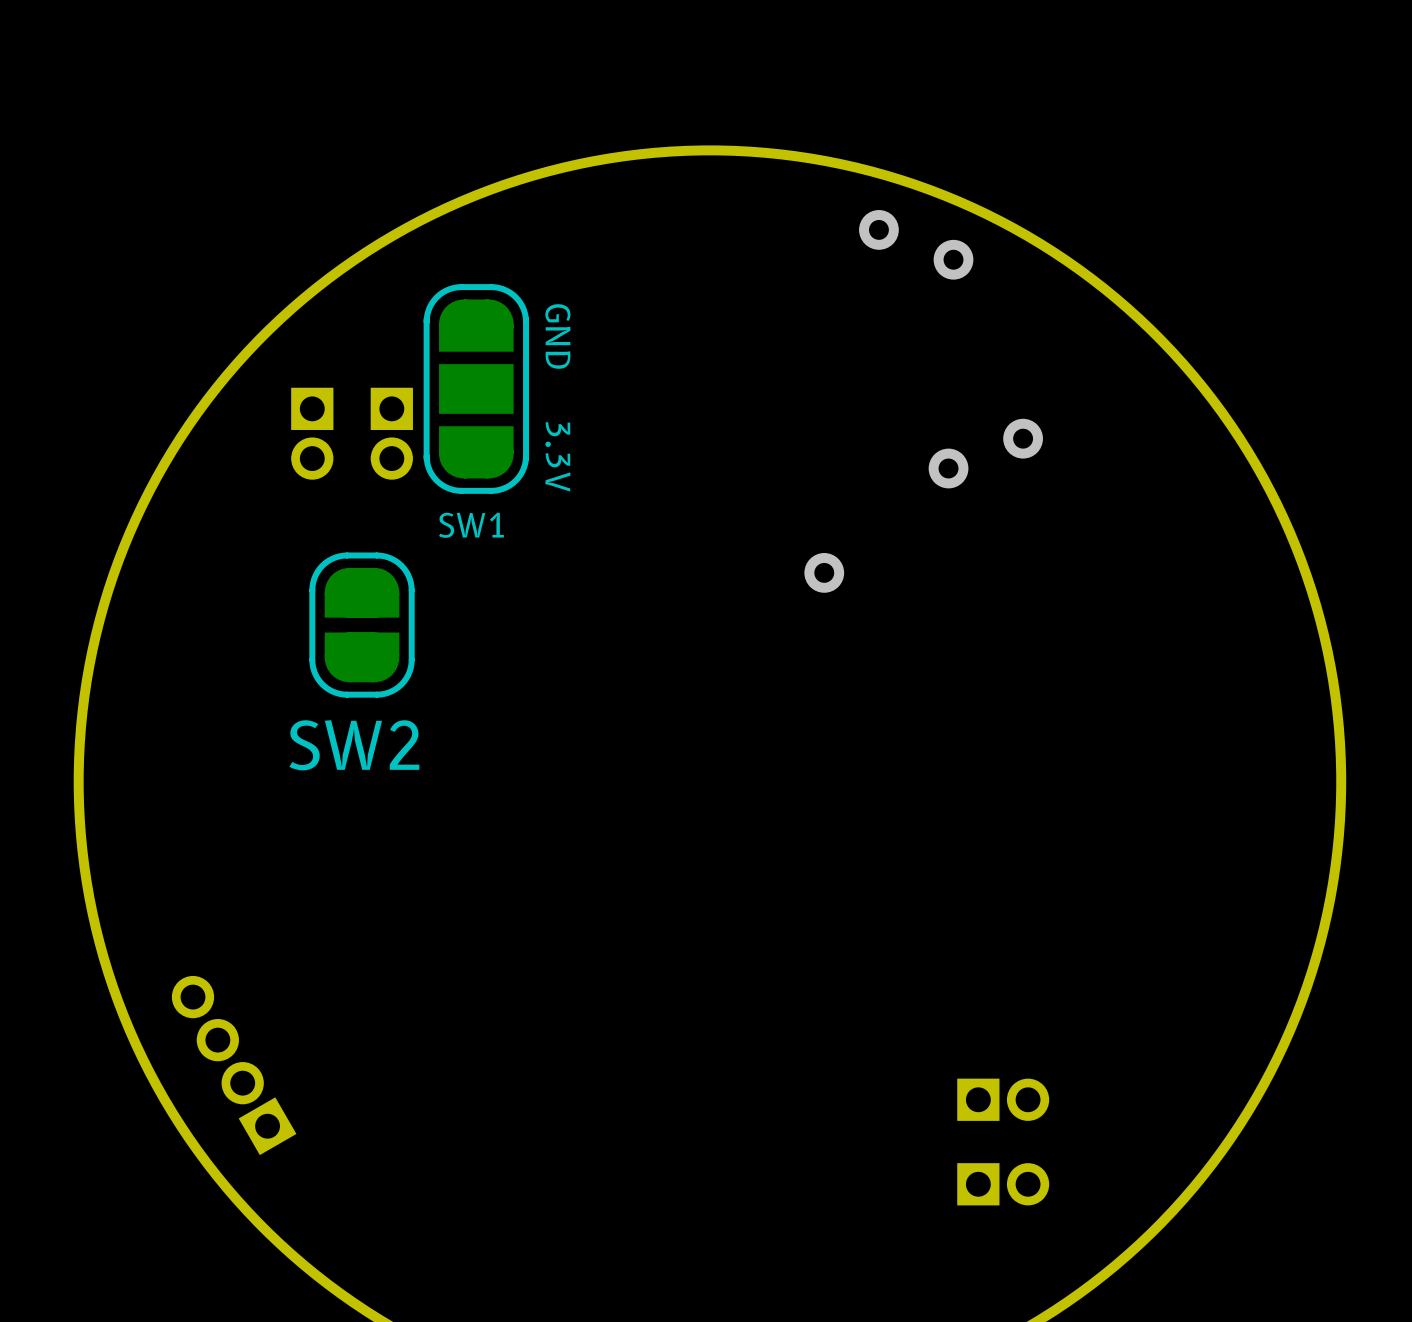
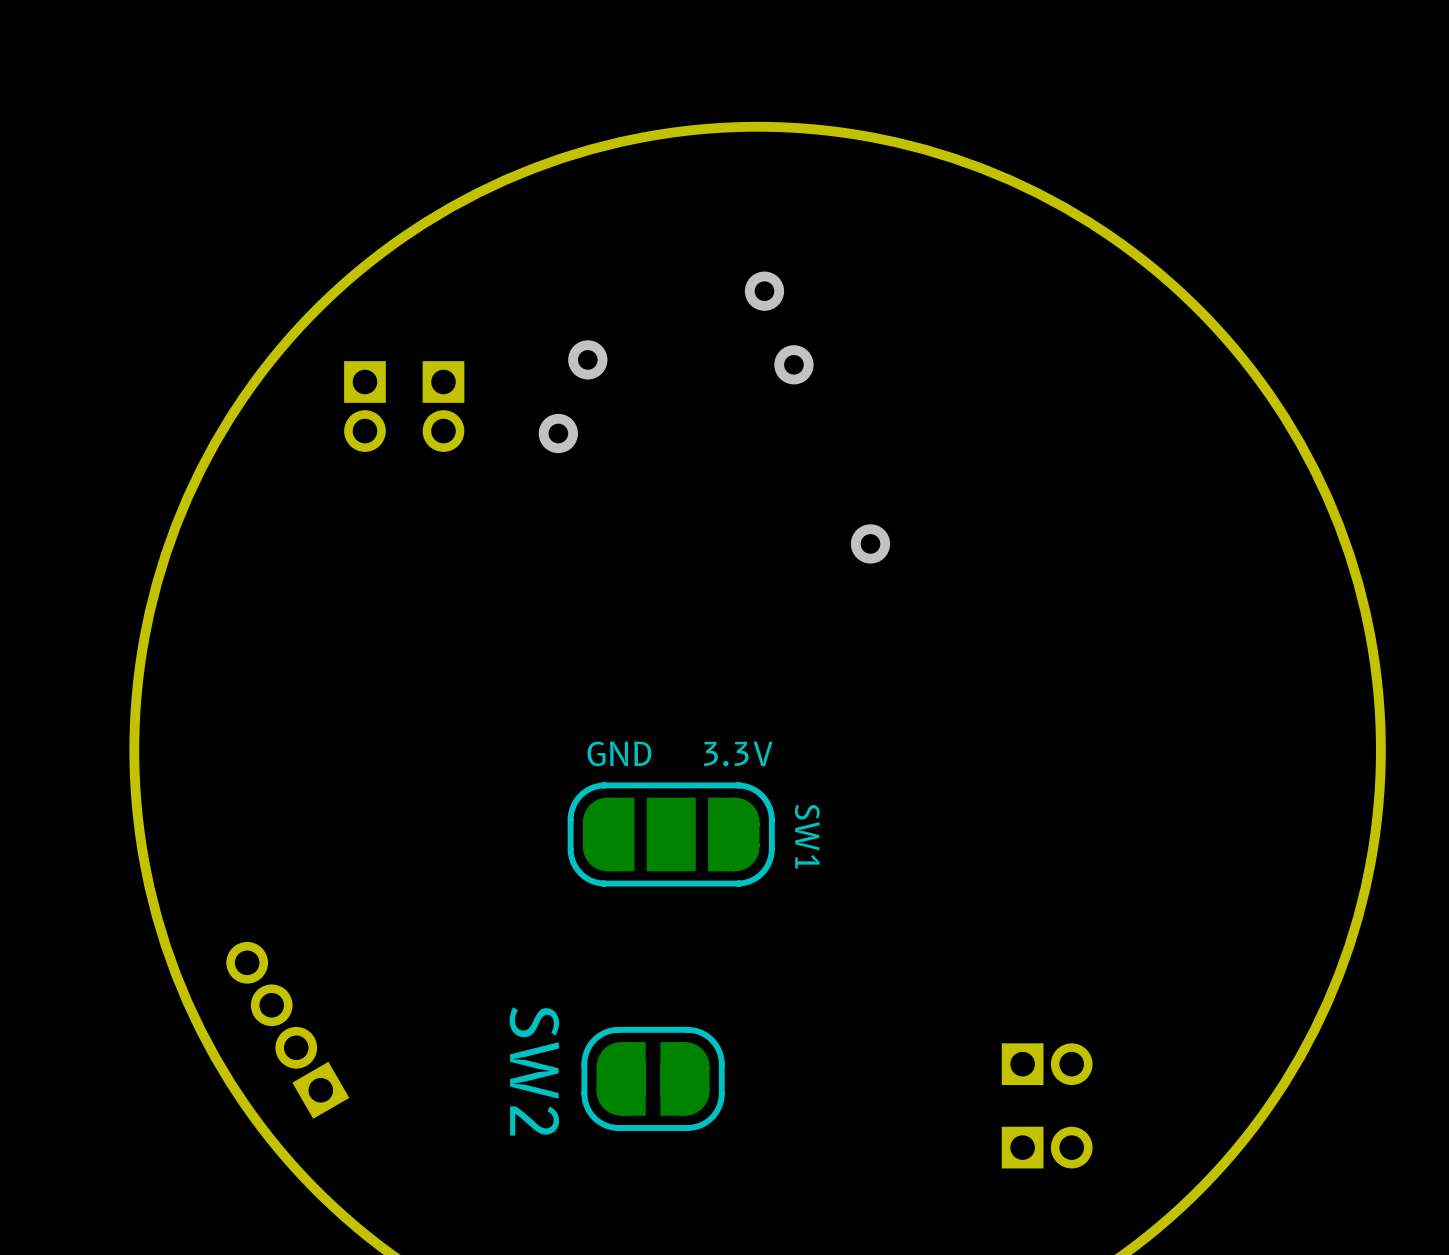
via: (878, 229) -> none
via: (953, 259) -> none
via: none -> (764, 291)
via: none -> (587, 359)
SW1 rotation: 0° (476, 388) -> 90° counterclockwise (671, 834)
SW1 position: (476, 388) -> (671, 834)
via: none -> (793, 364)
via: (1023, 438) -> none
via: none -> (558, 433)
via: (948, 468) -> none
SW2 rotation: 0° (362, 625) -> 90° clockwise (653, 1078)
SW2 position: (362, 625) -> (653, 1078)

